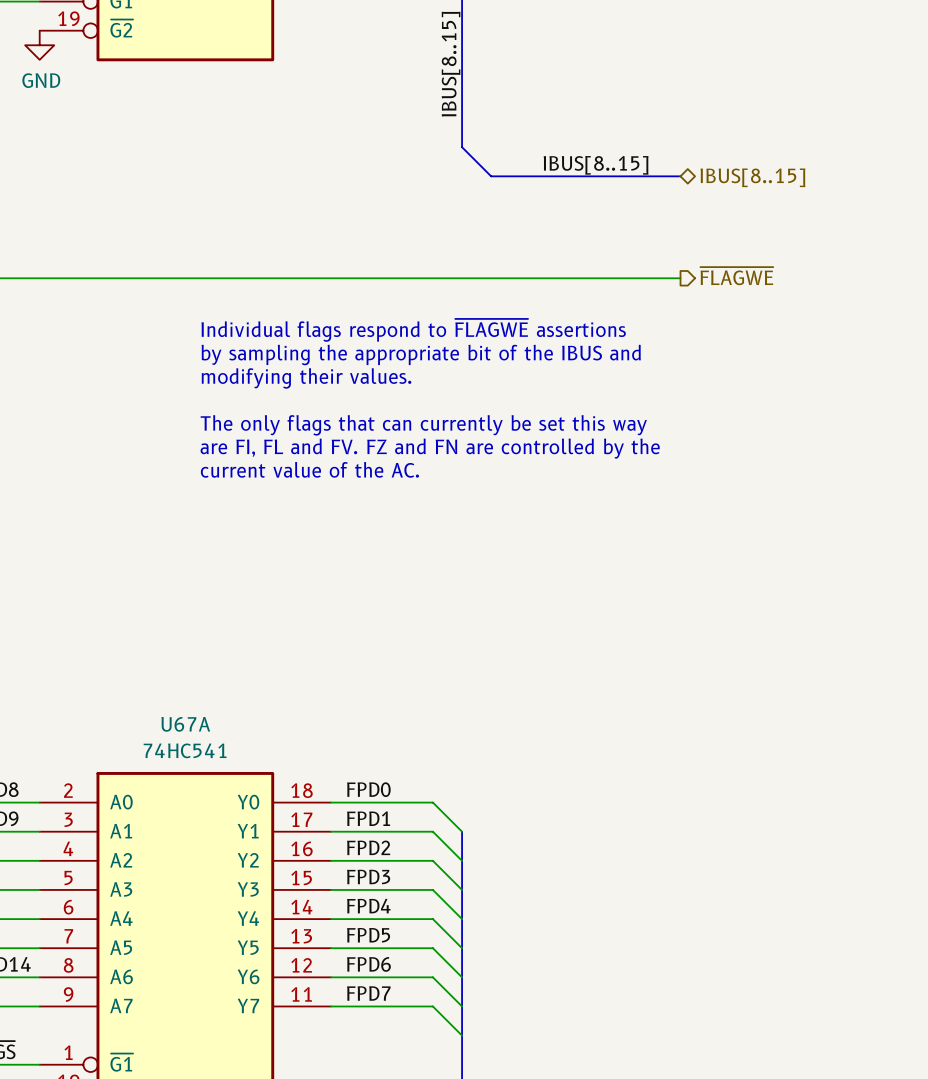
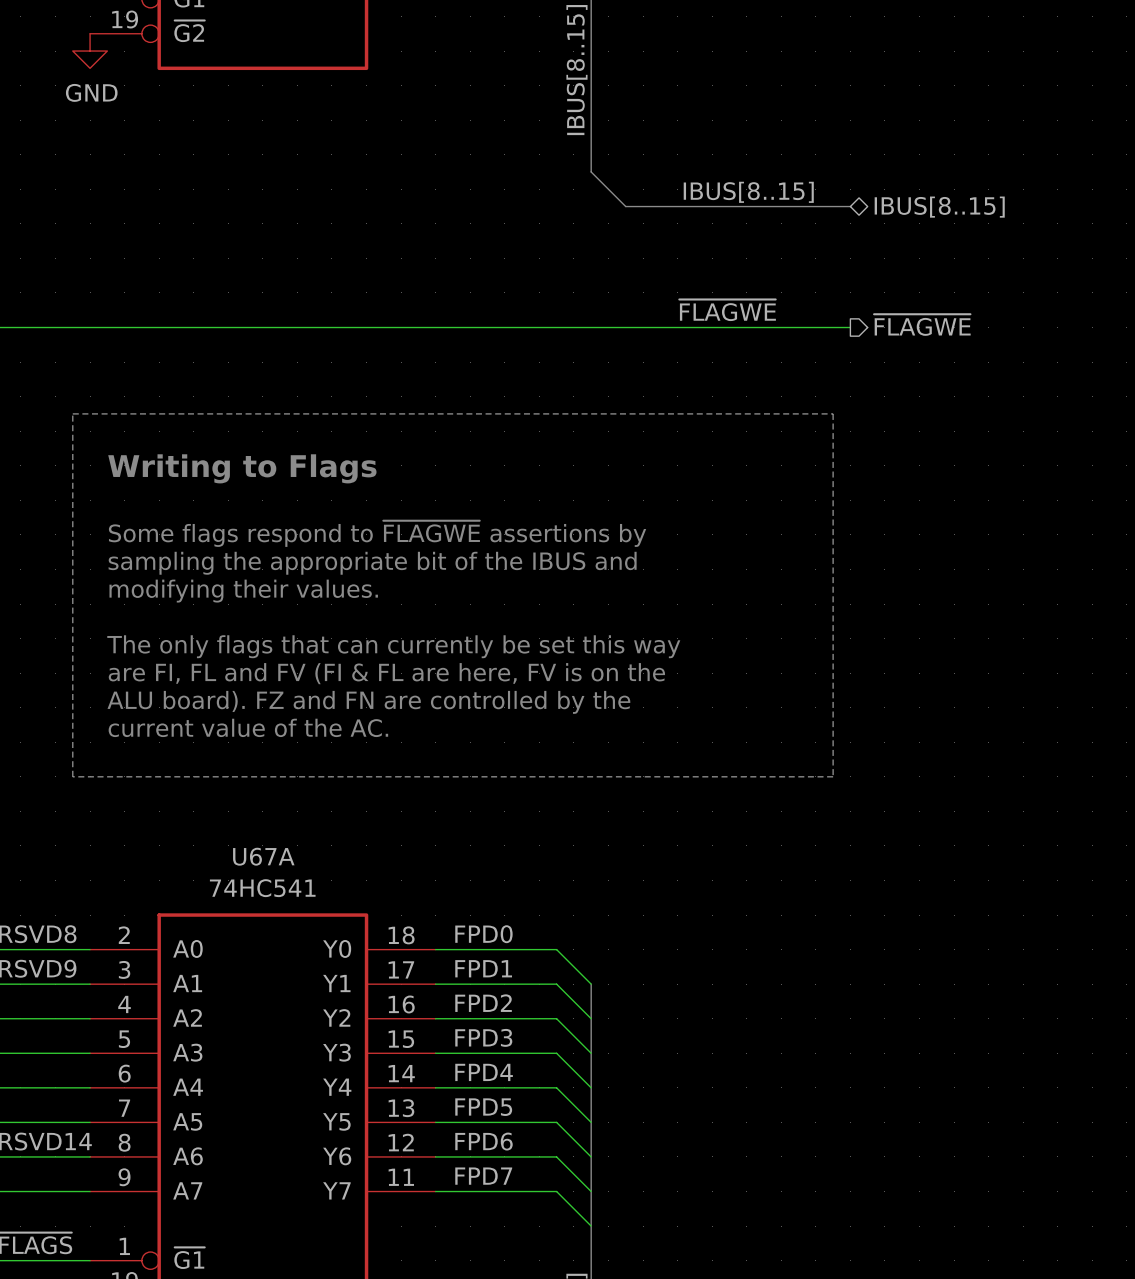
label: none -> ~{FLAGWE} (727, 310)
text: Individual flags respond to ~{FLAGWE} assertions (413, 330) -> none
line: none -> (72, 413) (833, 413) (833, 776) (72, 776) (72, 413)
text: by sampling the appropriate bit of the IBUS and (421, 355) -> none
text position: modifying their values. (306, 378) -> modifying their values. (243, 591)
text: none -> Writing to Flags (242, 468)
text position: The only flags that can currently be set this way (423, 425) -> The only flags that can currently be set this way (393, 646)
text: are FI, FL and FV. FZ and FN are controlled by the (430, 448) -> none
text: none -> Some flags respond to ~{FLAGWE} assertions by (377, 533)
text position: current value of the AC. (309, 469) -> current value of the AC. (248, 727)
text: none -> sampling the appropriate bit of the IBUS and (372, 563)
text: none -> are FI, FL and FV (FI & FL are here, FV is on the (386, 673)
text: none -> ALU board). FZ and FN are controlled by the (368, 702)

